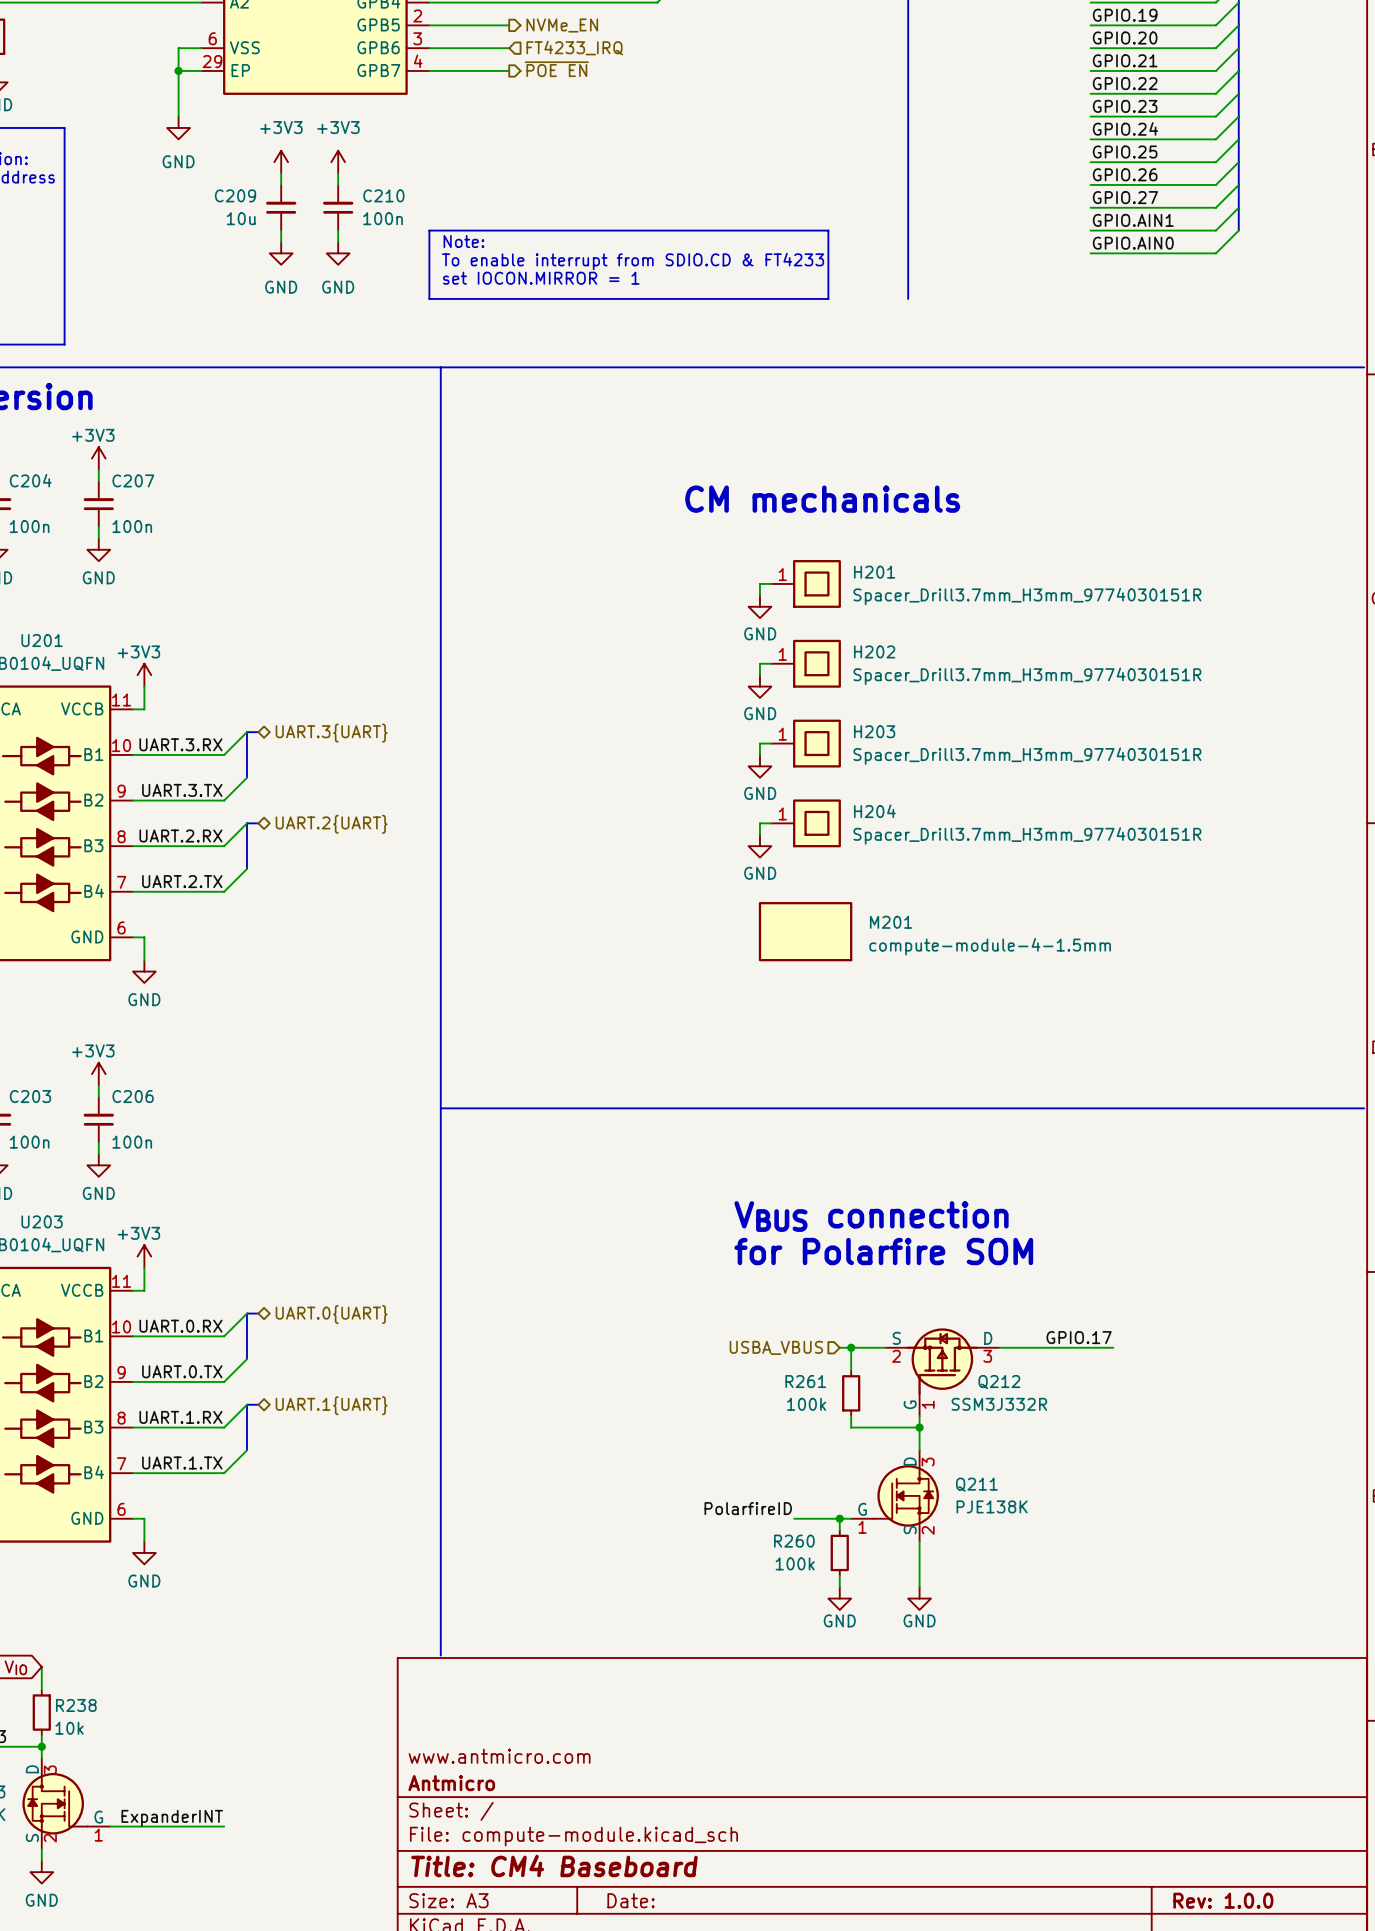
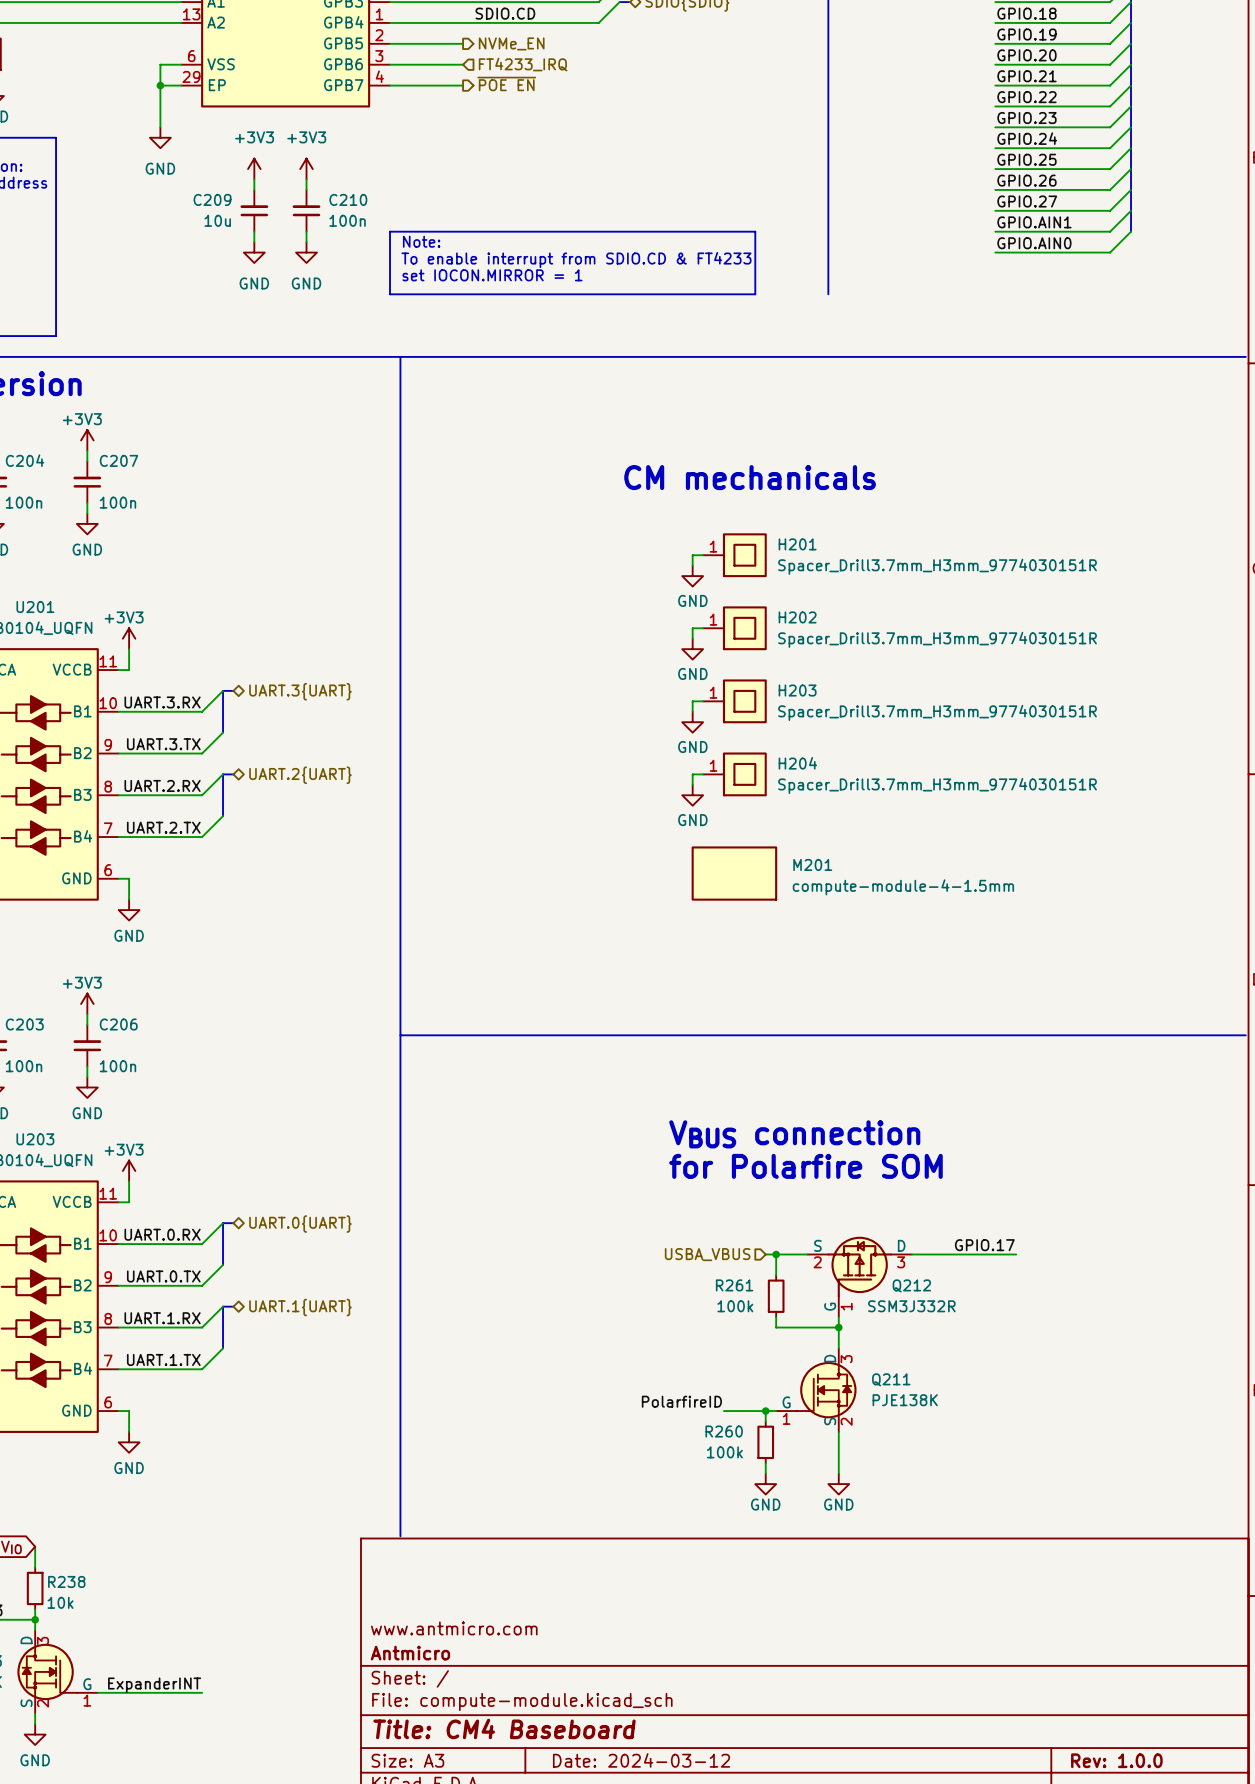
title block: Date: (631, 1900) -> Date: 2024-03-12 (641, 1760)

